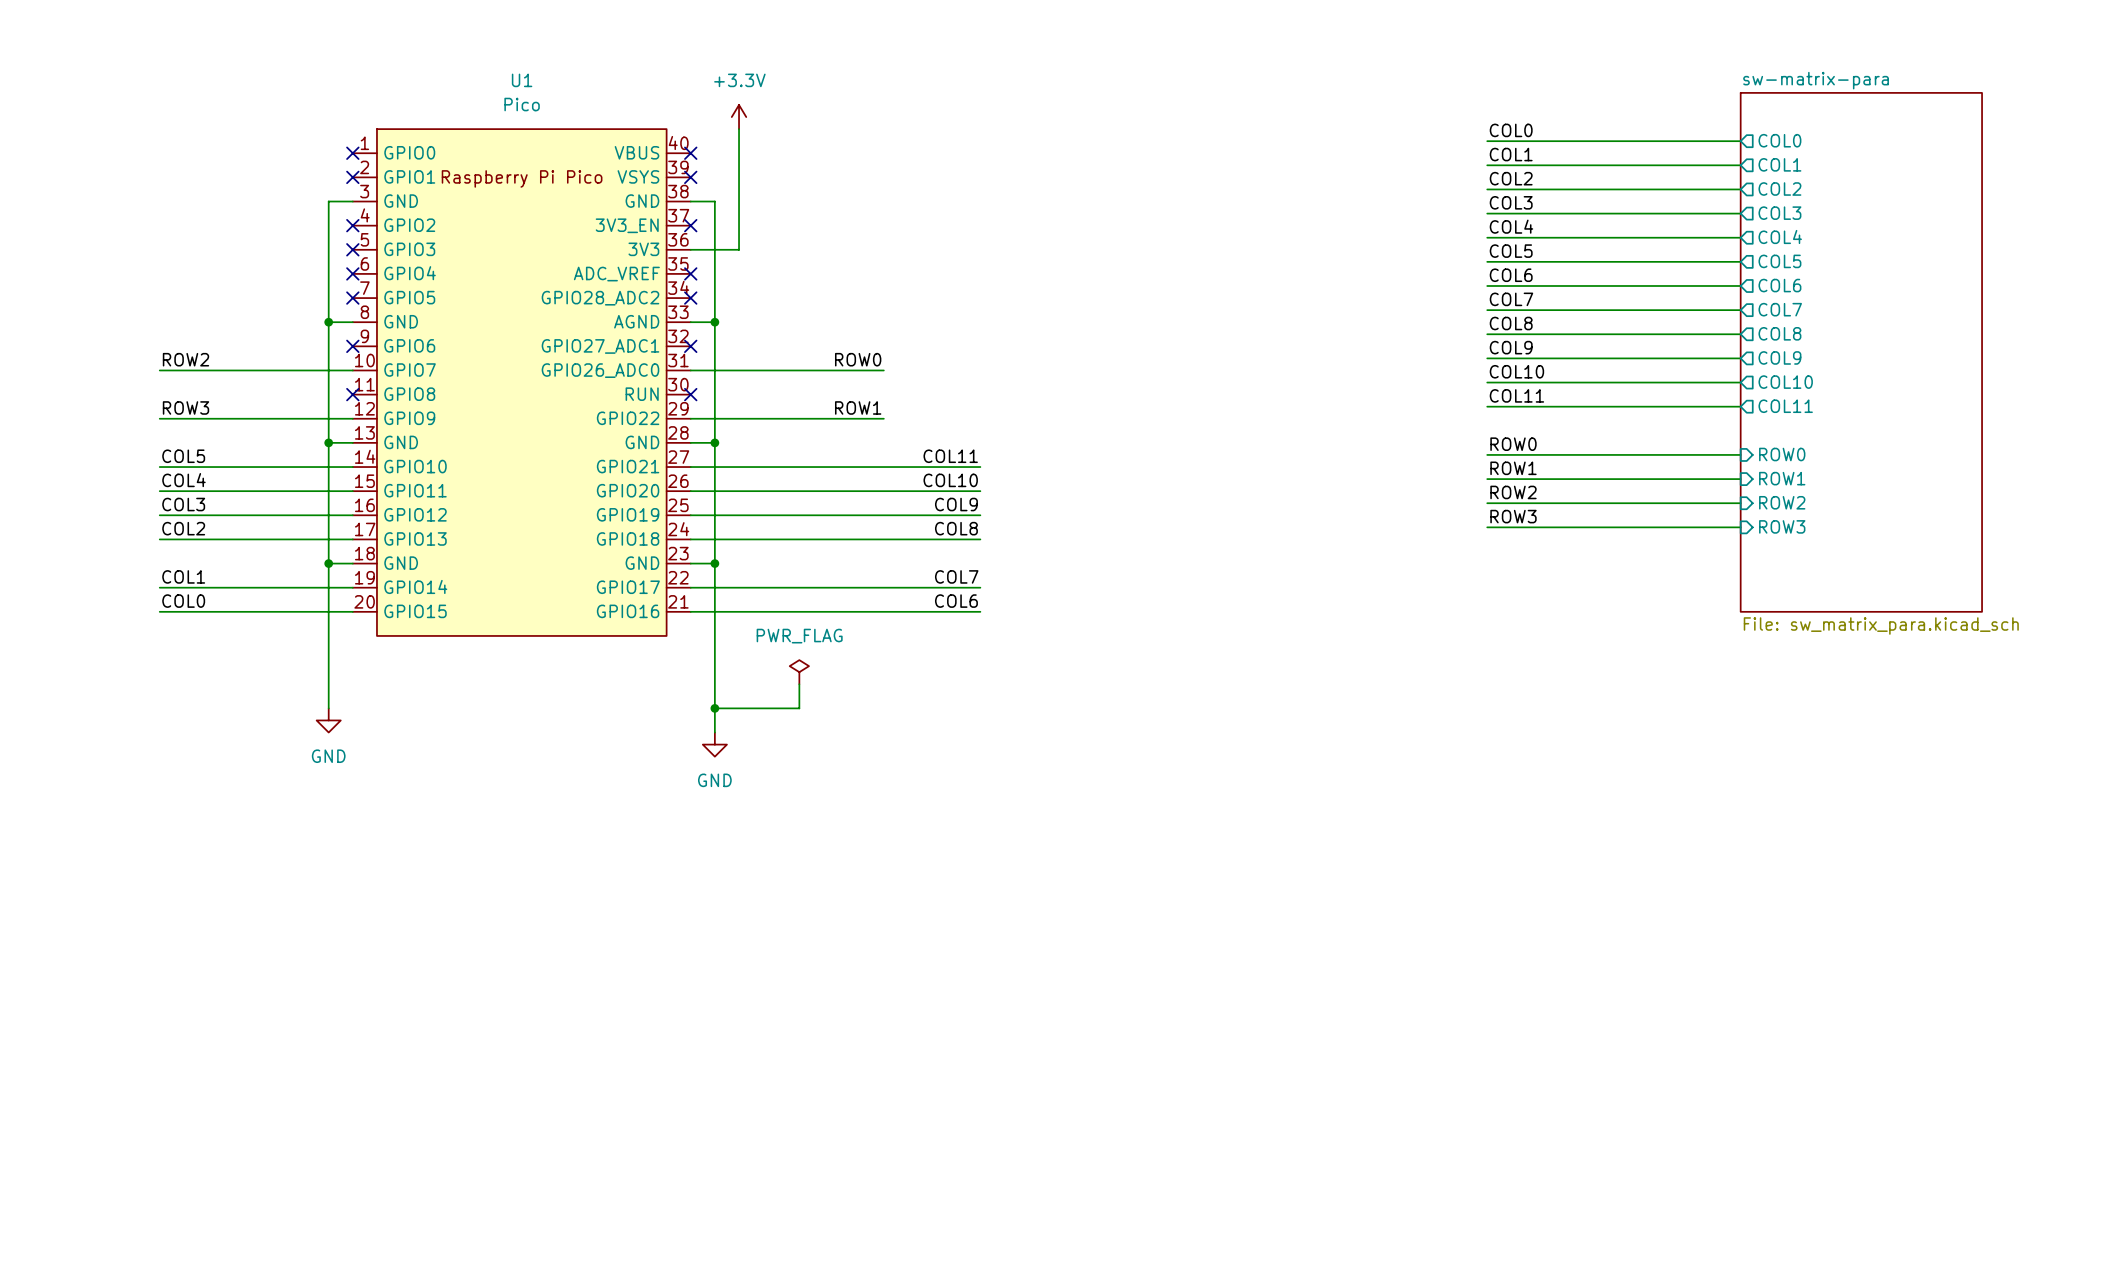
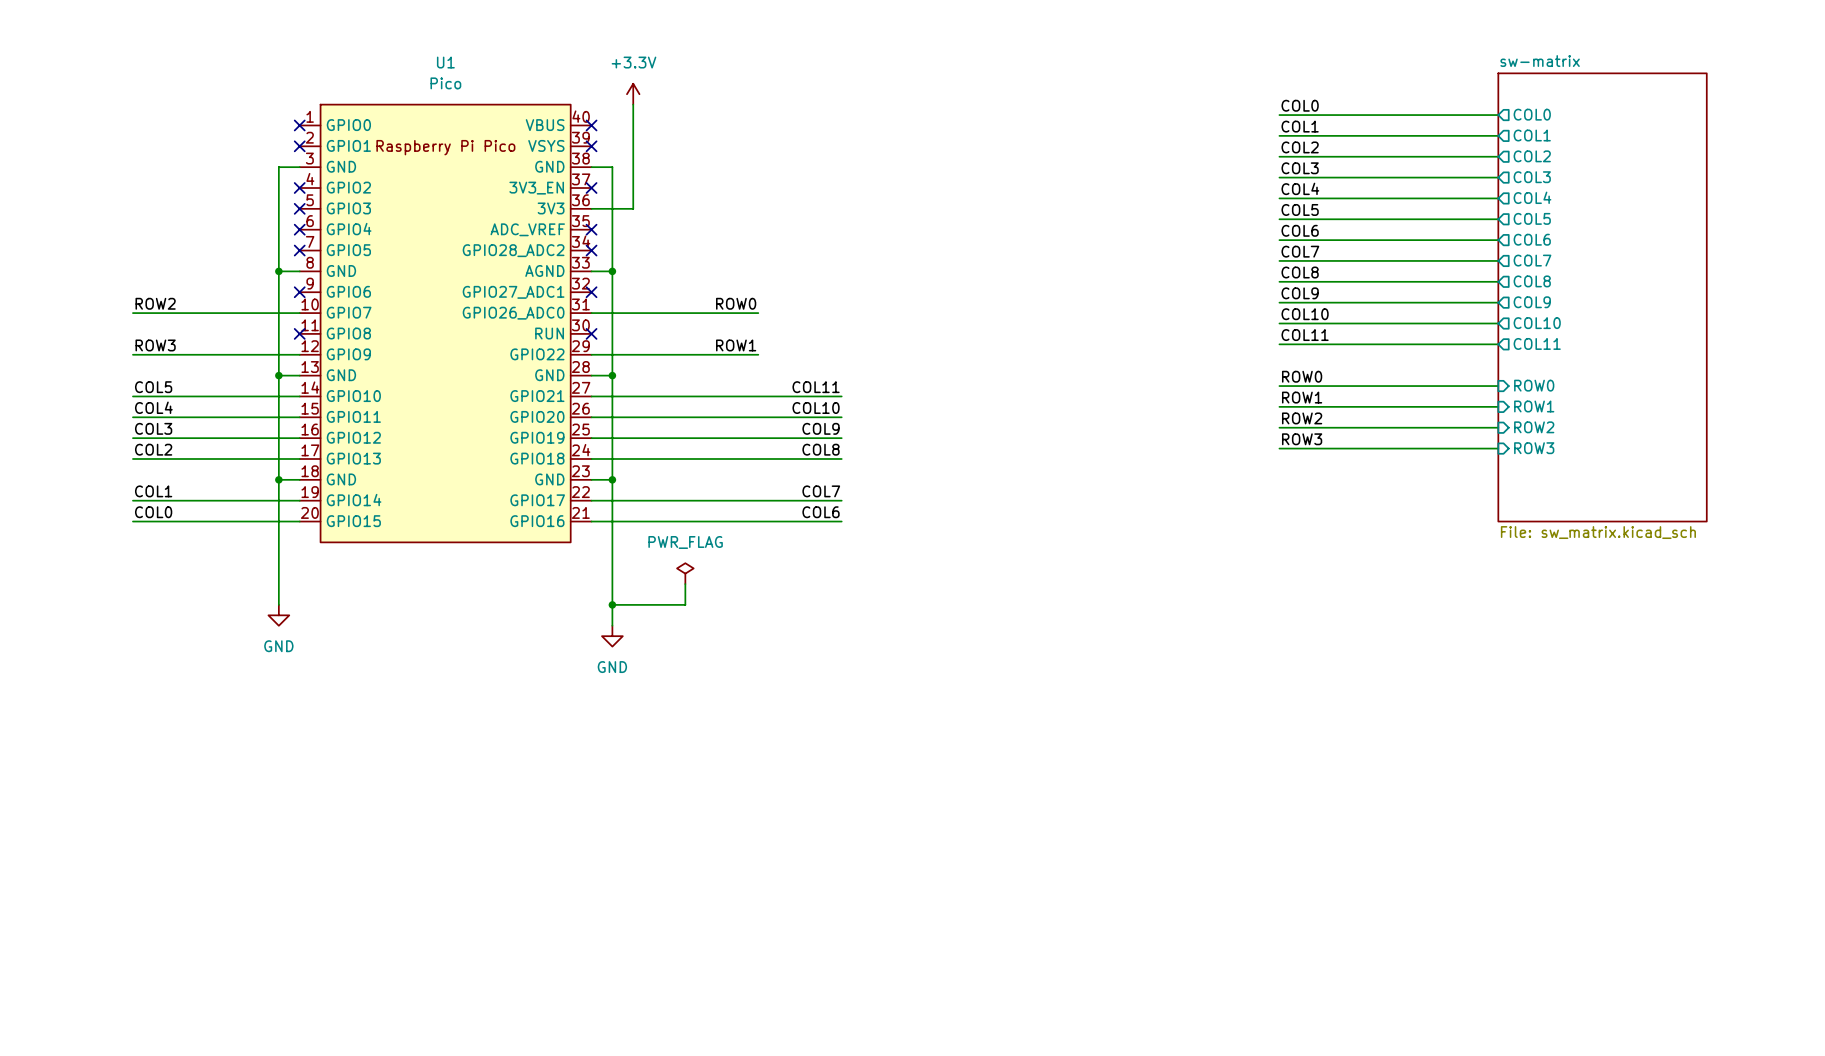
sheet sw-matrix-para name: sw-matrix-para (1816, 80) -> sw-matrix (1540, 61)
sheet sw-matrix-para value: File: sw_matrix_para.kicad_sch (1881, 626) -> File: sw_matrix.kicad_sch (1598, 532)

